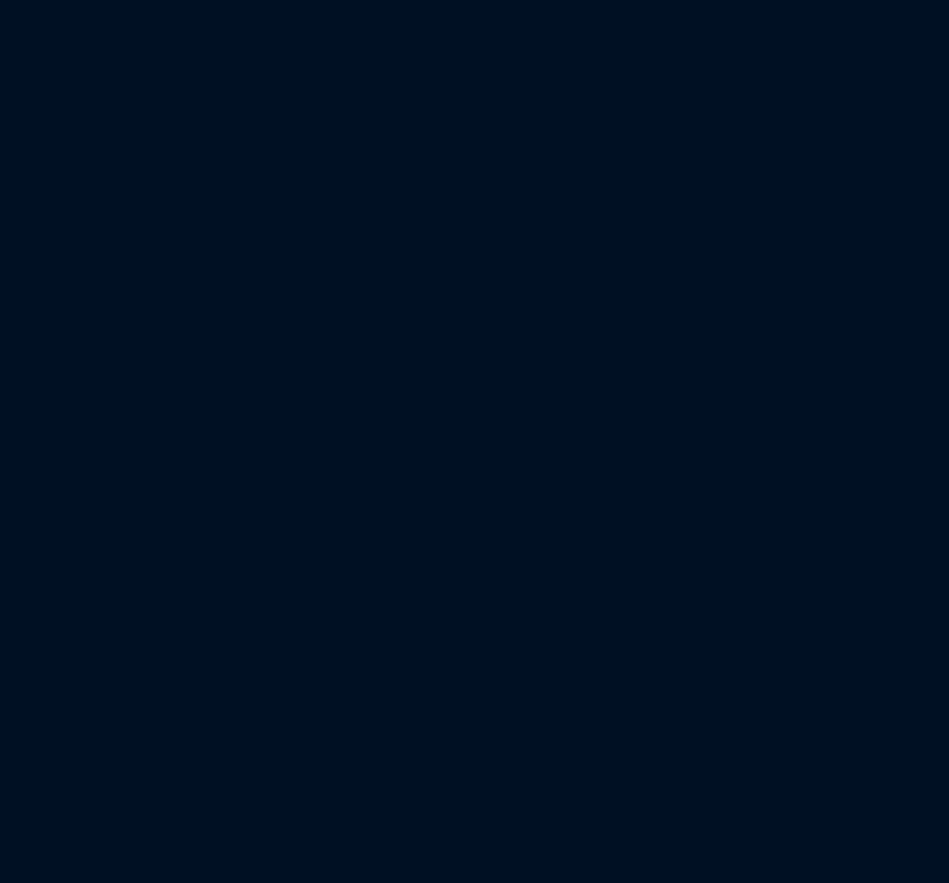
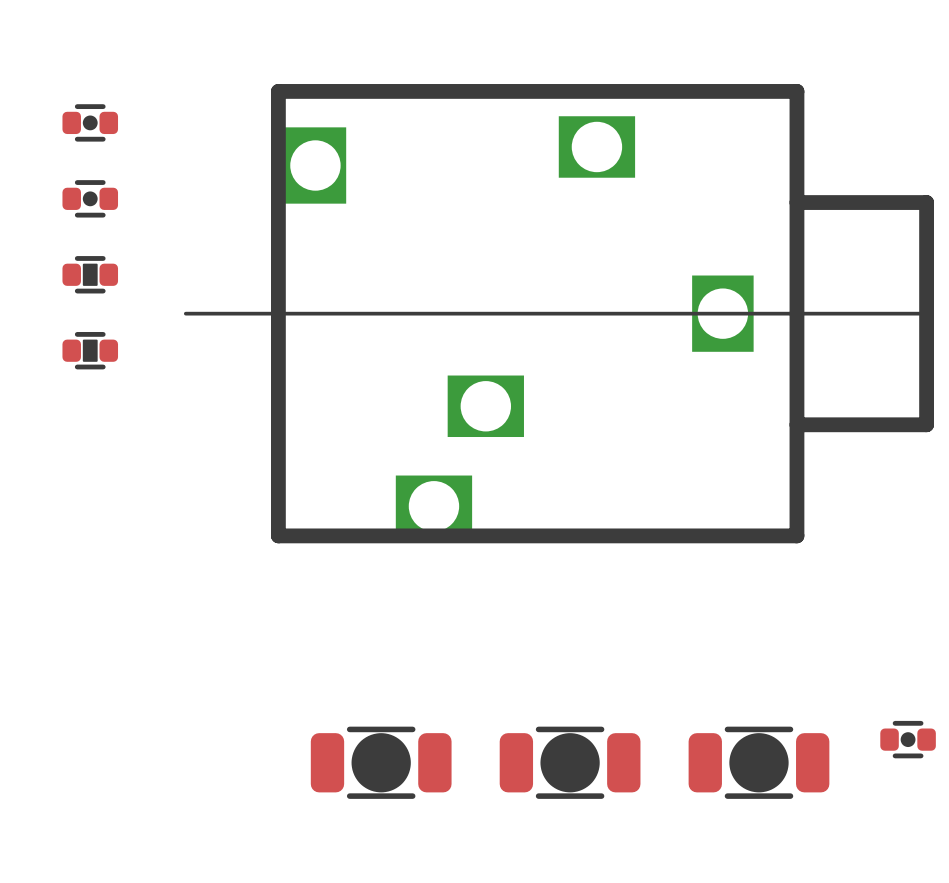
part: none -> (90, 122)
part: none -> (90, 198)
part: none -> (90, 274)
part: none -> (558, 313)
part: none -> (90, 350)
part: none -> (908, 739)
part: none -> (381, 762)
part: none -> (570, 762)
part: none -> (758, 762)

